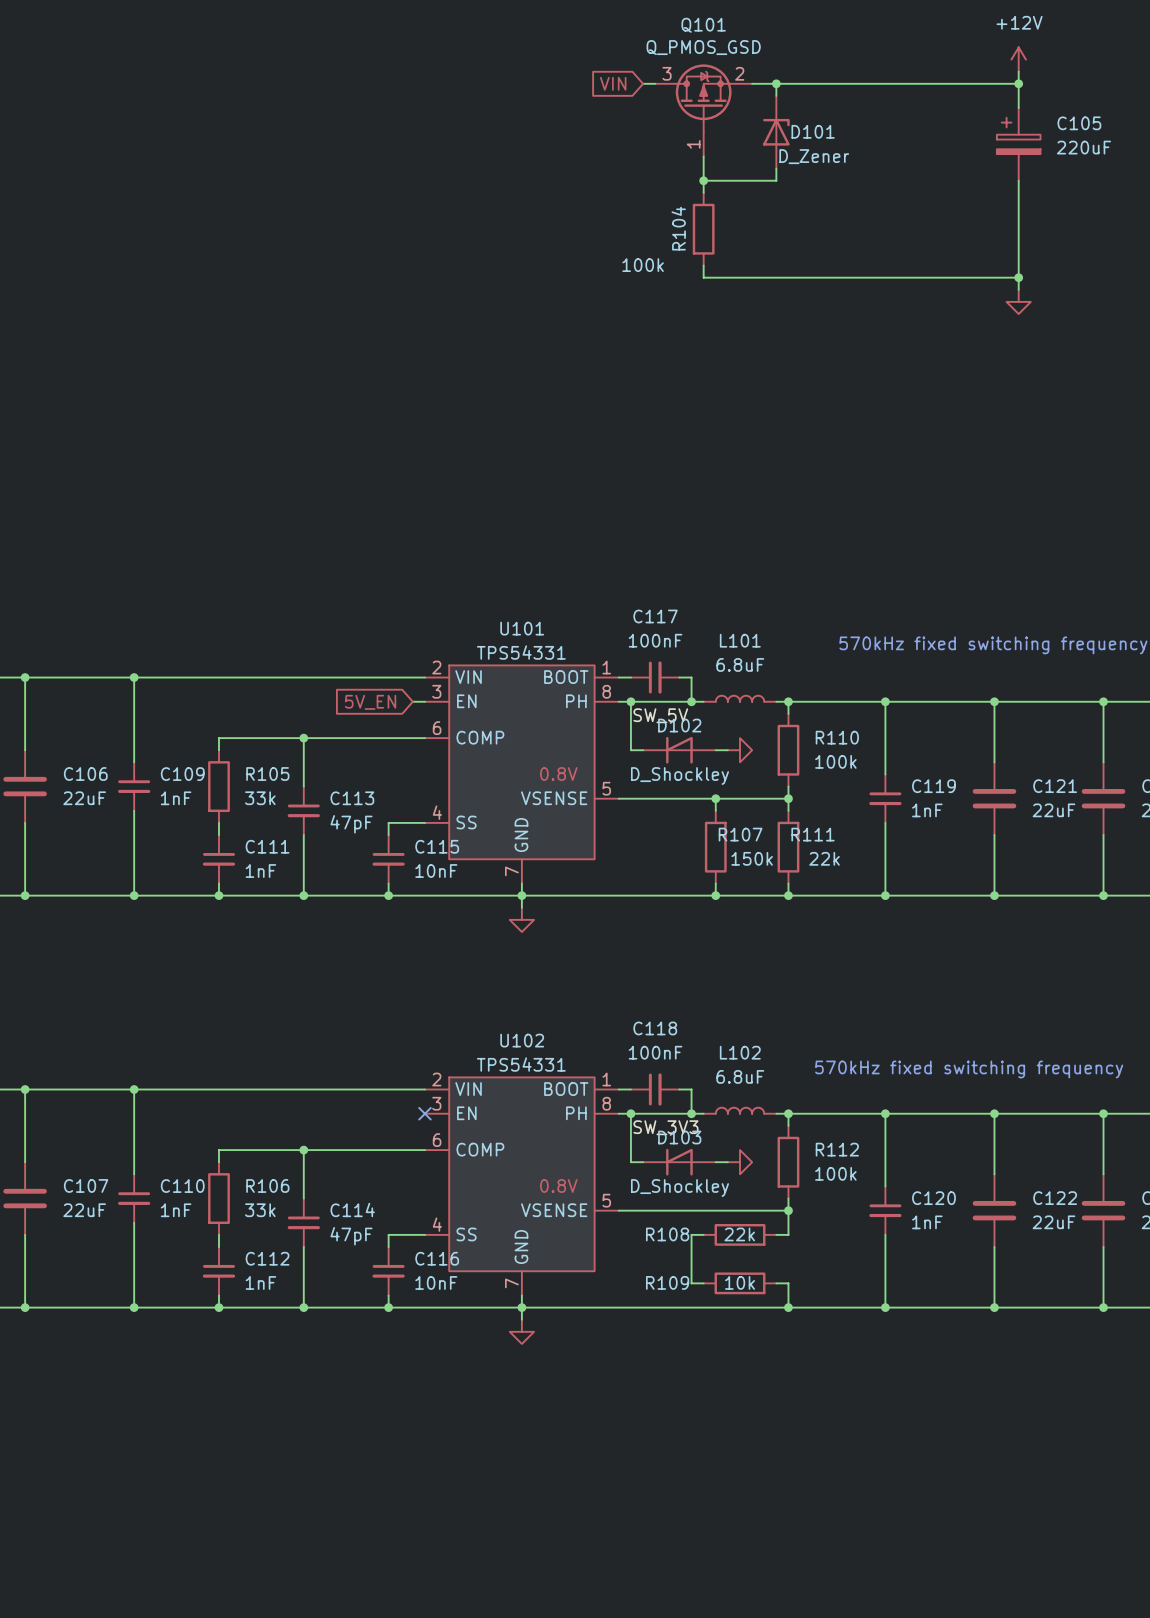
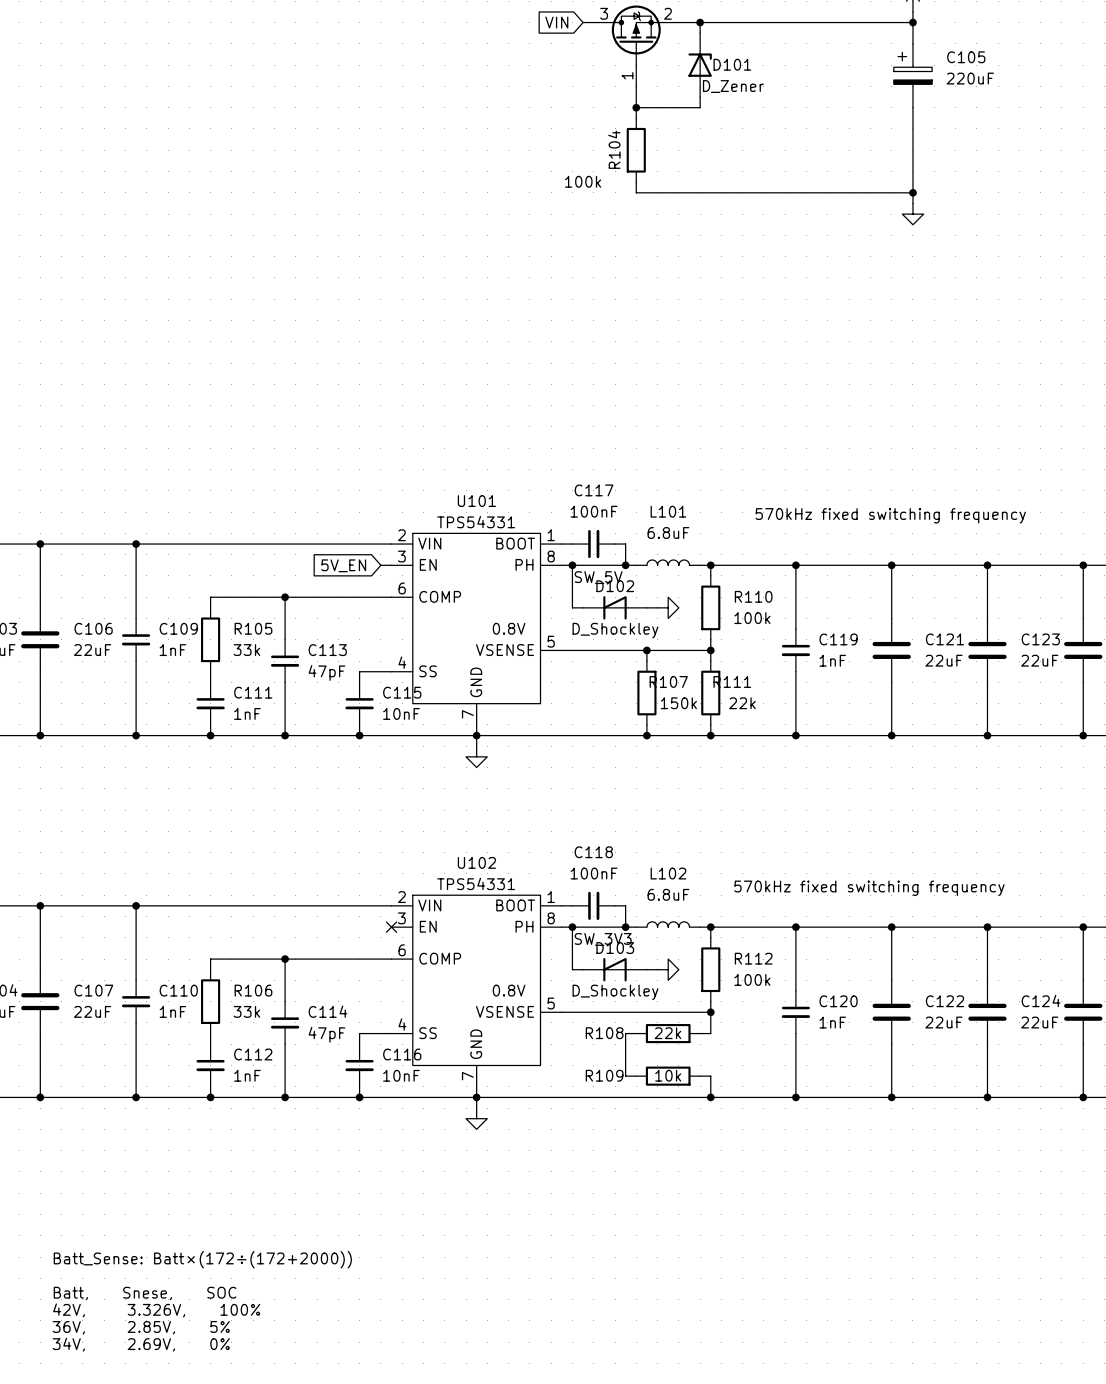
text: none -> Batt_Sense: Batt×(172÷(172+2000)) (202, 1259)
text: none -> Batt, Snese, SOC (145, 1293)
text: none -> 42V, 3.326V, 100% (156, 1310)
text: none -> 36V, 2.85V, 5% (141, 1327)
text: none -> 34V, 2.69V, 0% (141, 1344)

